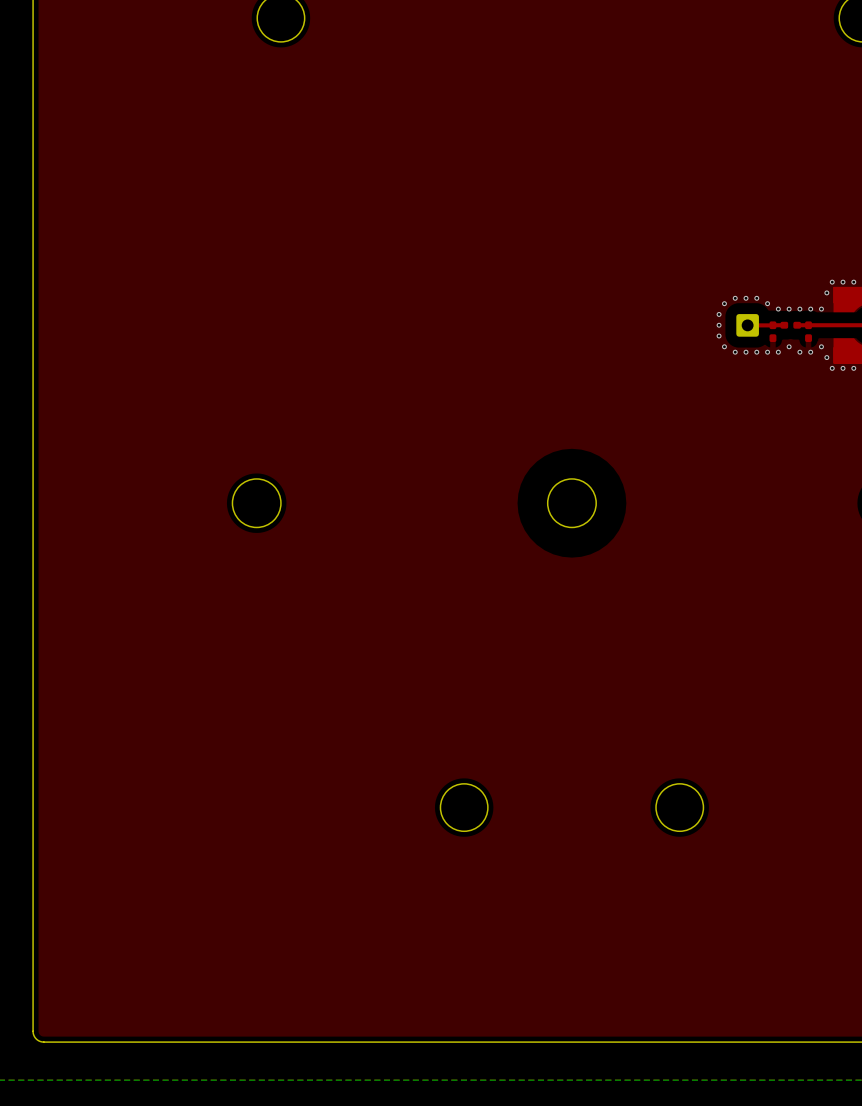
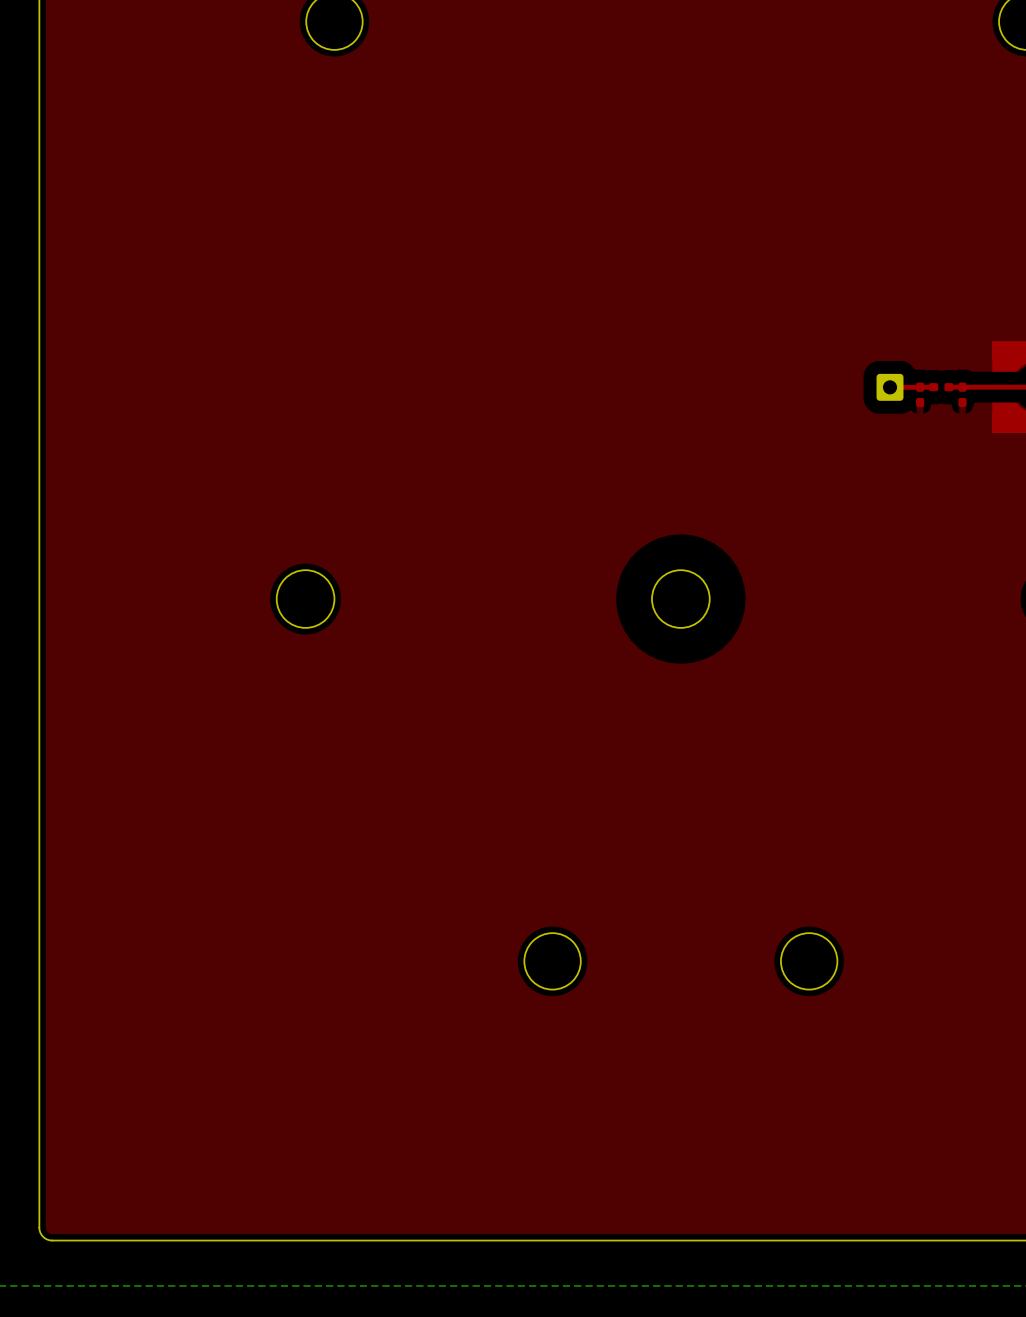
via: (832, 282) -> none
via: (843, 282) -> none
via: (853, 282) -> none
via: (826, 292) -> none
via: (735, 298) -> none
via: (746, 298) -> none
via: (756, 298) -> none
via: (724, 303) -> none
via: (767, 303) -> none
via: (778, 309) -> none
via: (789, 309) -> none
via: (799, 309) -> none
via: (810, 309) -> none
via: (821, 309) -> none
via: (719, 314) -> none
via: (719, 325) -> none
via: (719, 336) -> none
via: (724, 346) -> none
via: (789, 346) -> none
via: (821, 346) -> none
via: (735, 352) -> none
via: (746, 352) -> none
via: (756, 352) -> none
via: (767, 352) -> none
via: (778, 352) -> none
via: (799, 352) -> none
via: (810, 352) -> none
via: (826, 357) -> none
via: (832, 368) -> none
via: (843, 368) -> none
via: (853, 368) -> none

